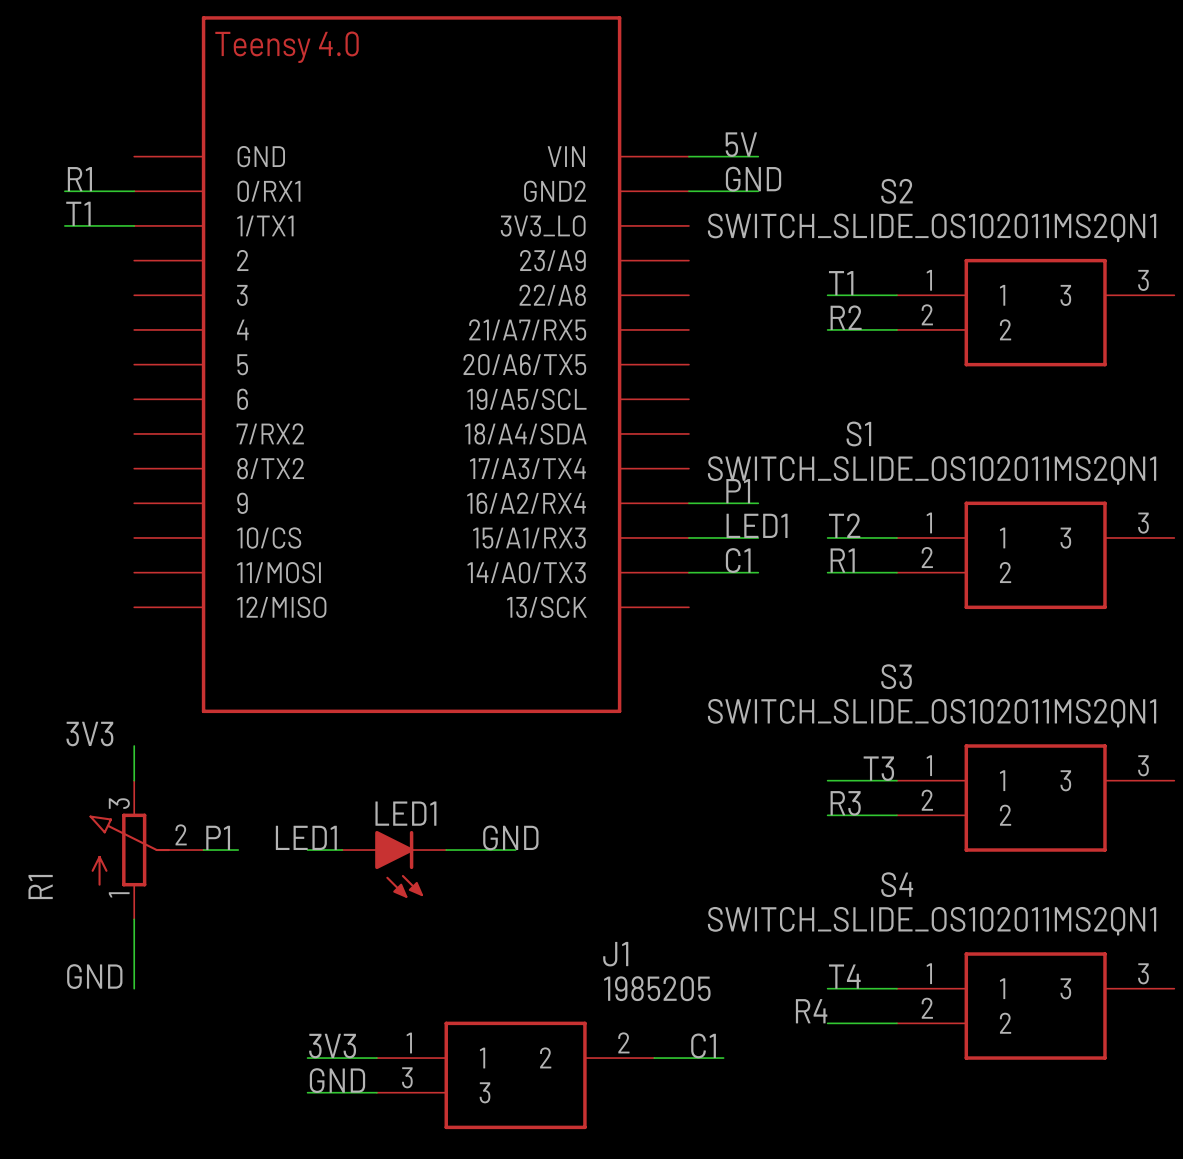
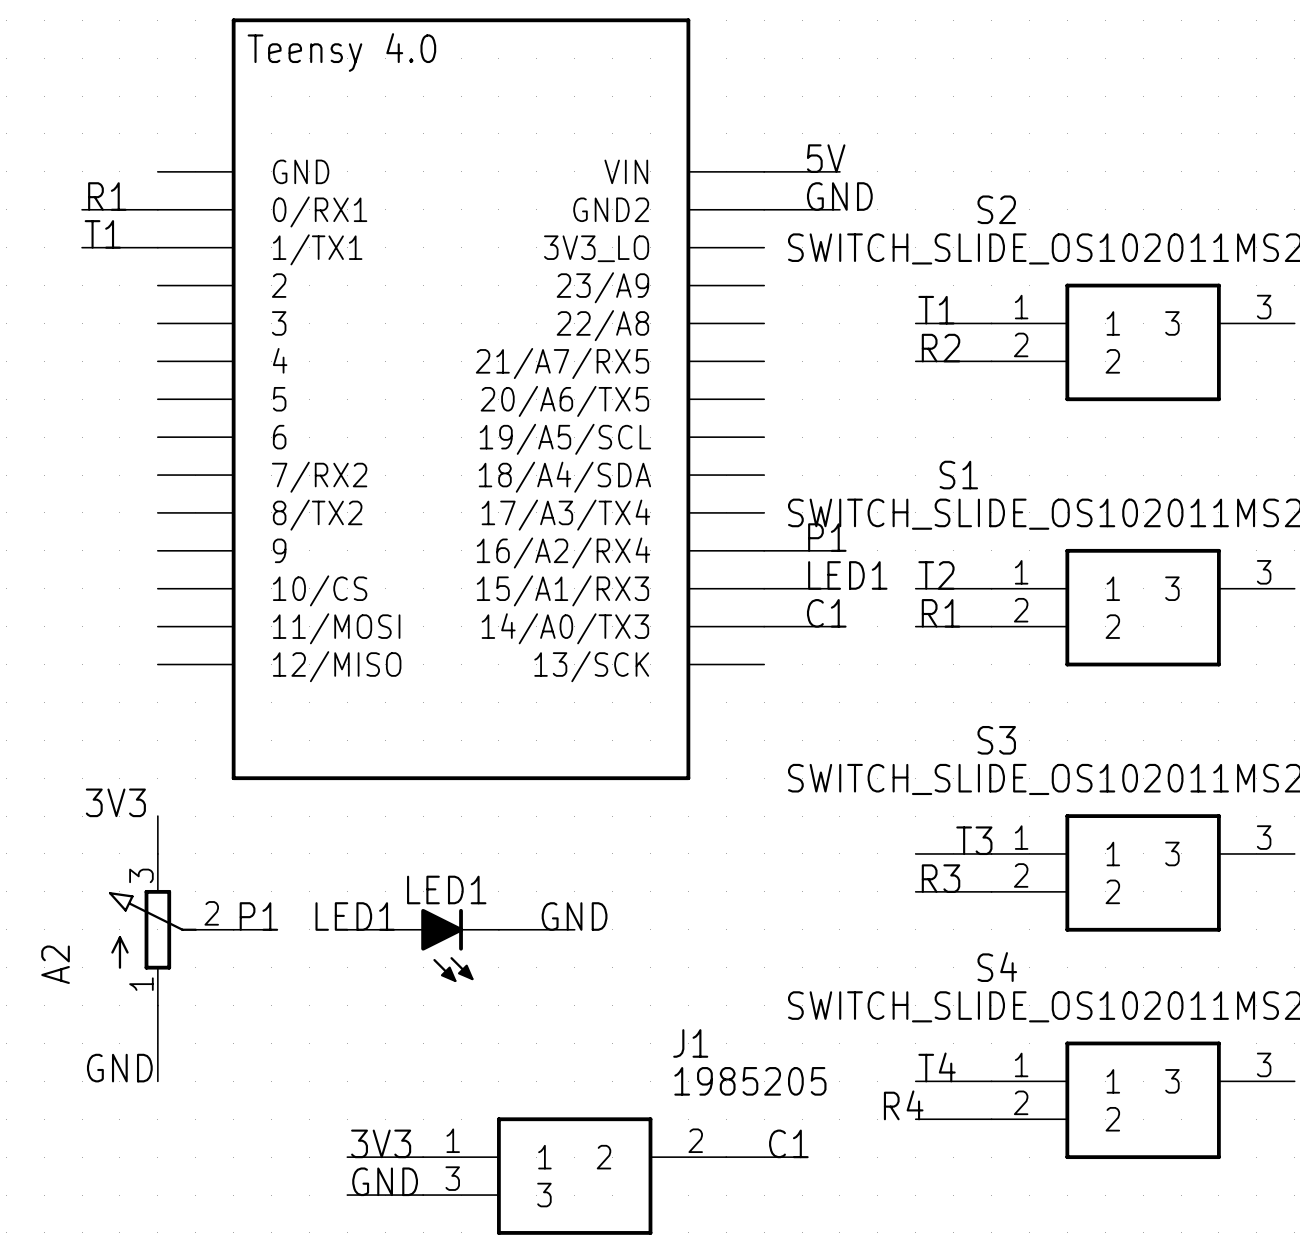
R1 name: R1 (40, 887) -> A2 (55, 964)

